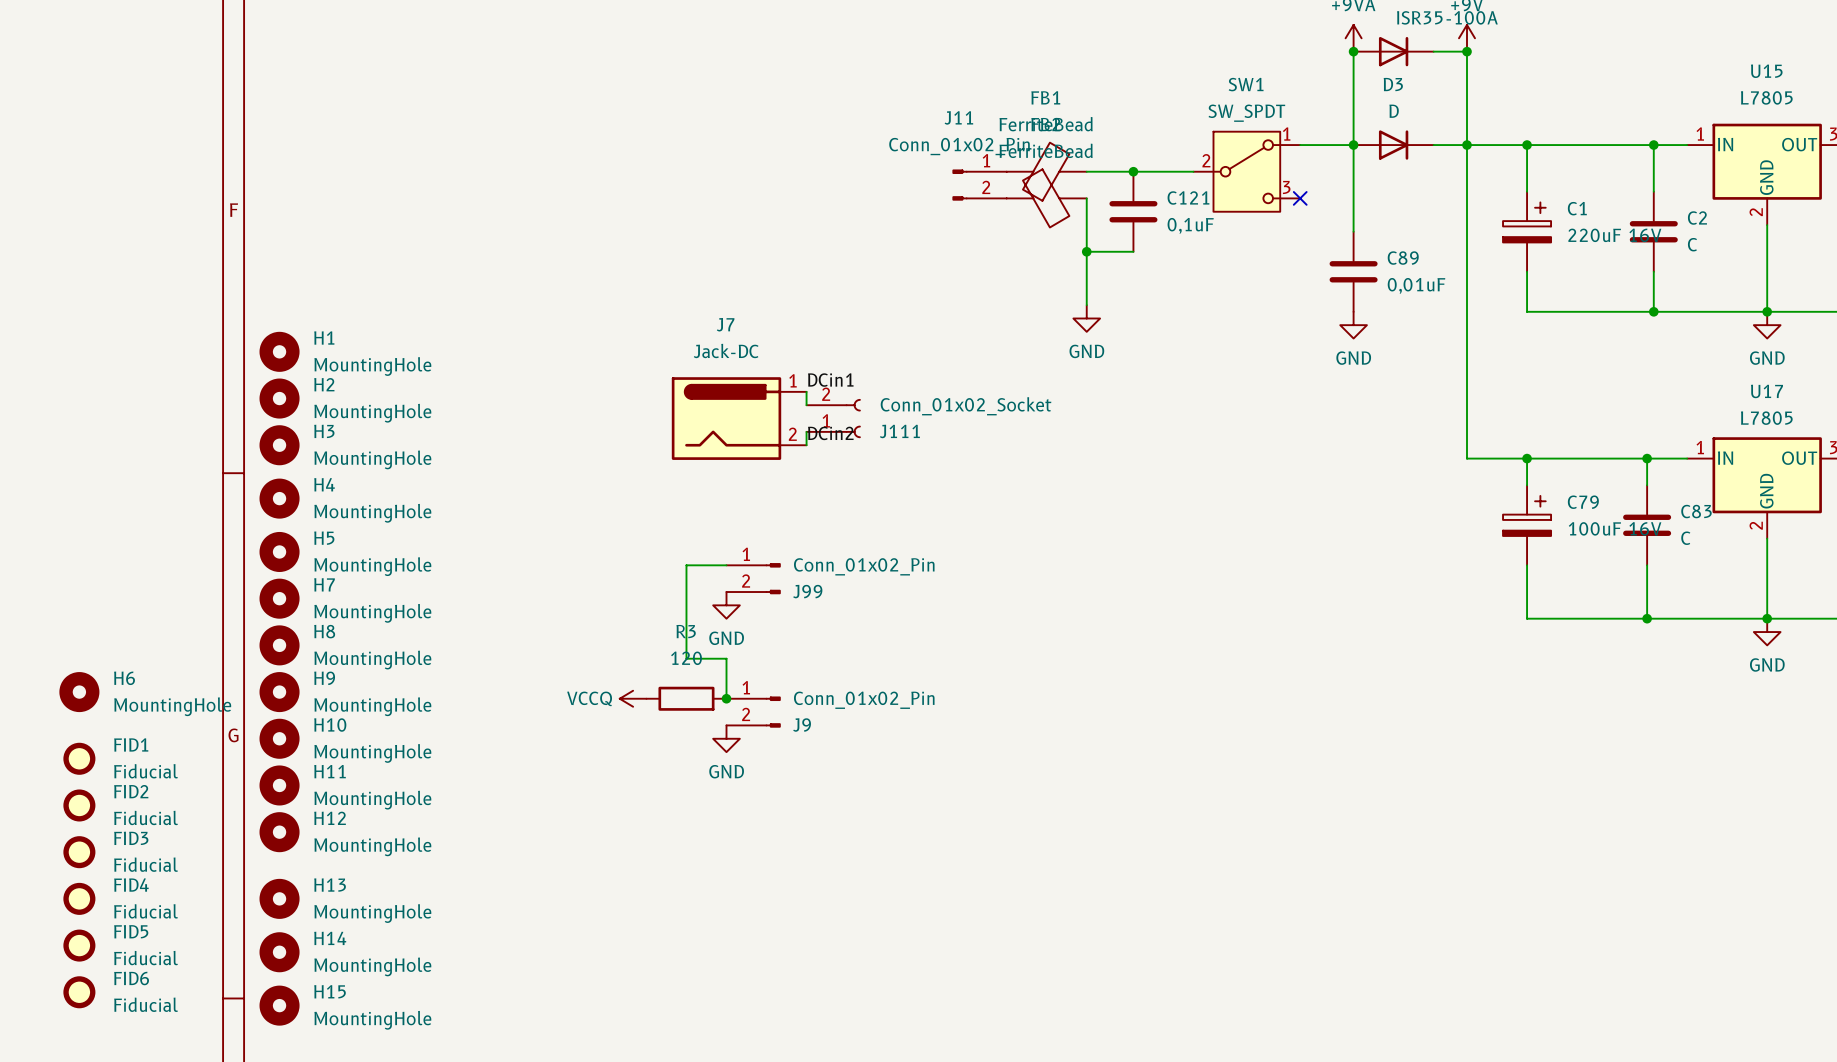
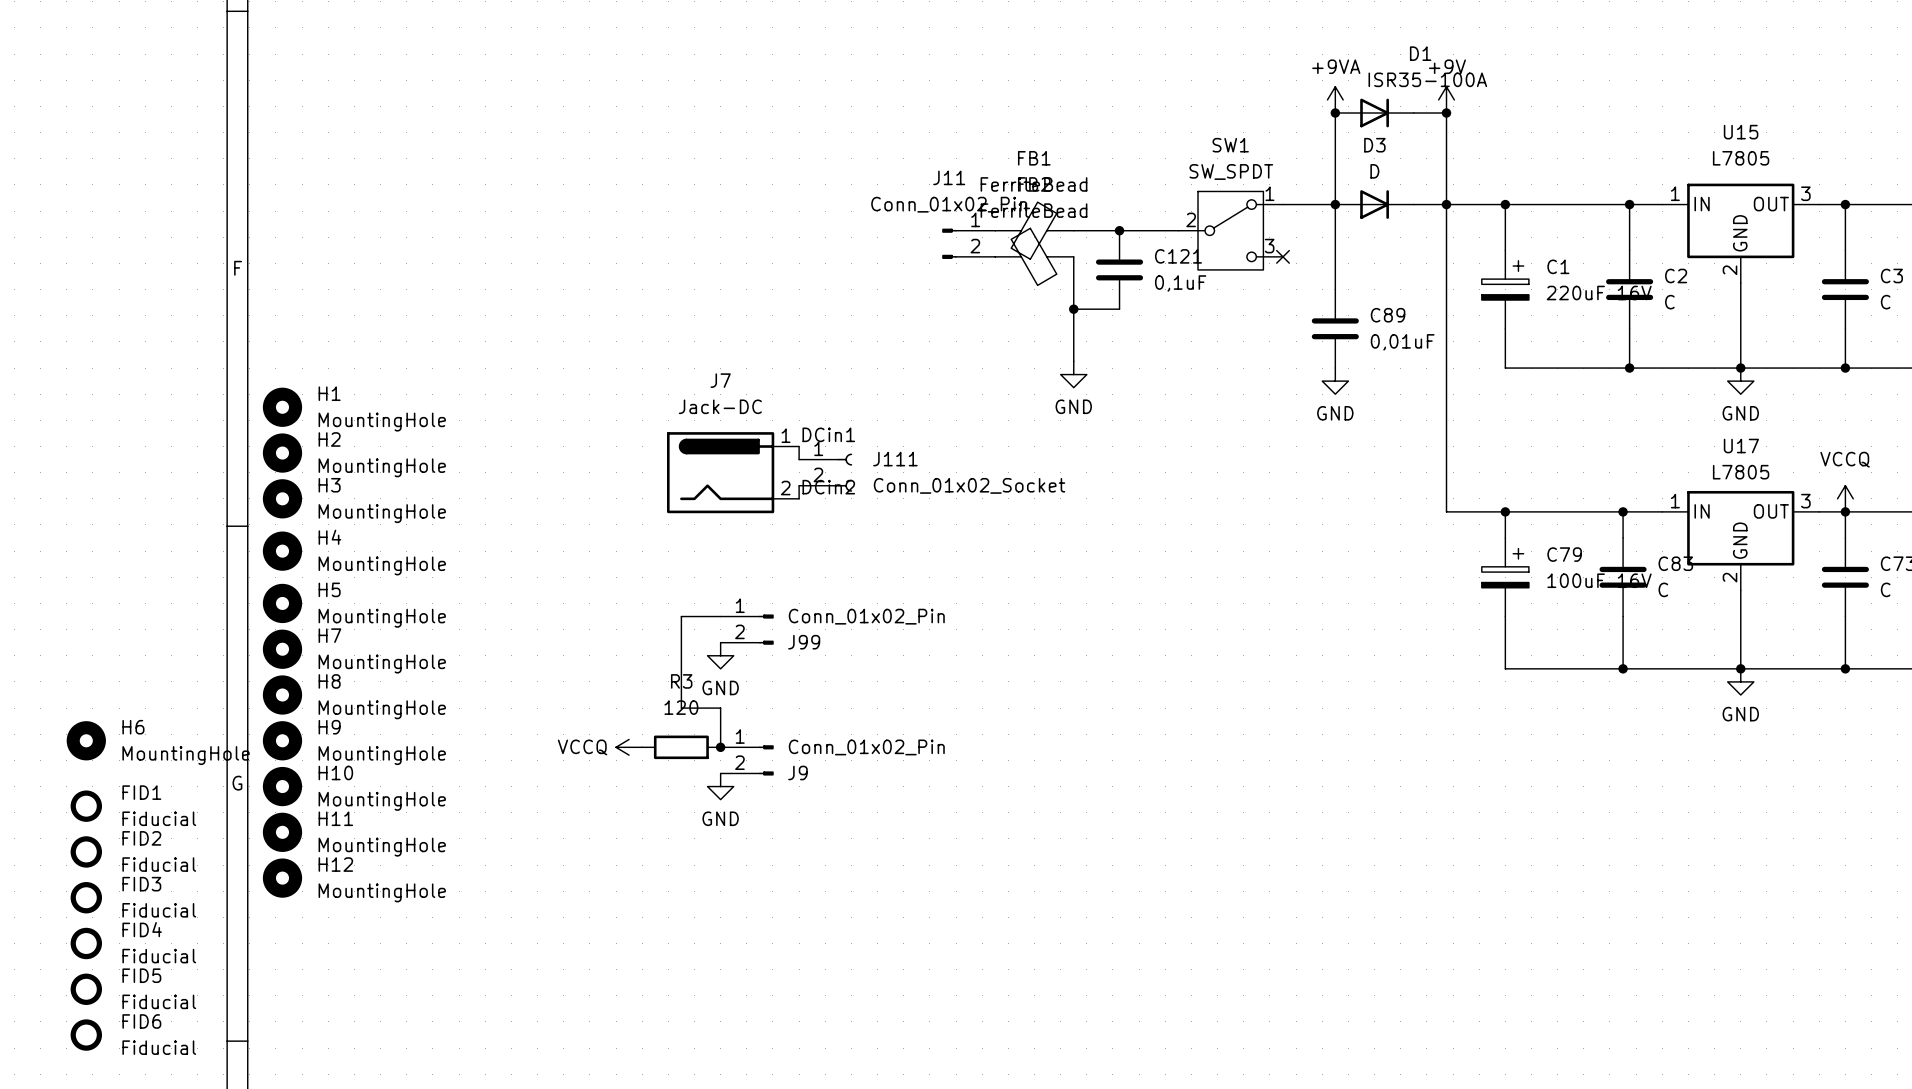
J111 flip: as is (853, 418) -> up-down (844, 472)
H13: MountingHole (279, 898) -> none
H14: MountingHole (279, 952) -> none
H15: MountingHole (279, 1005) -> none

